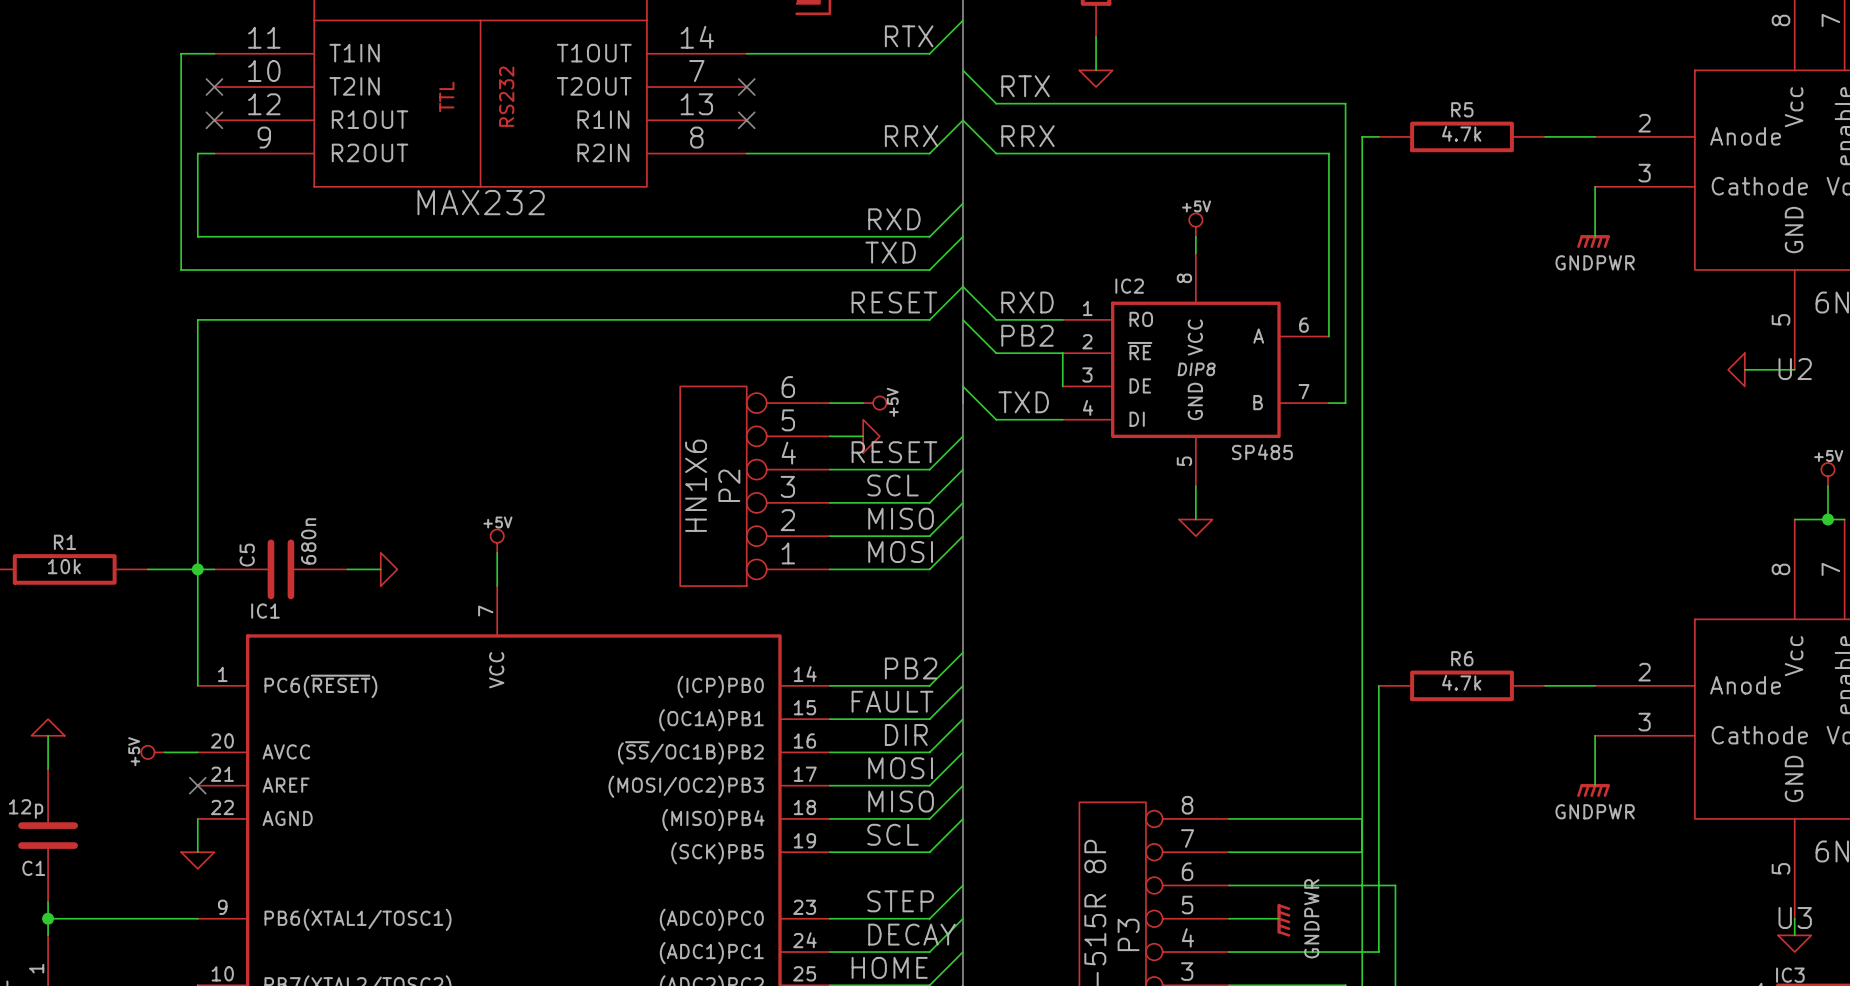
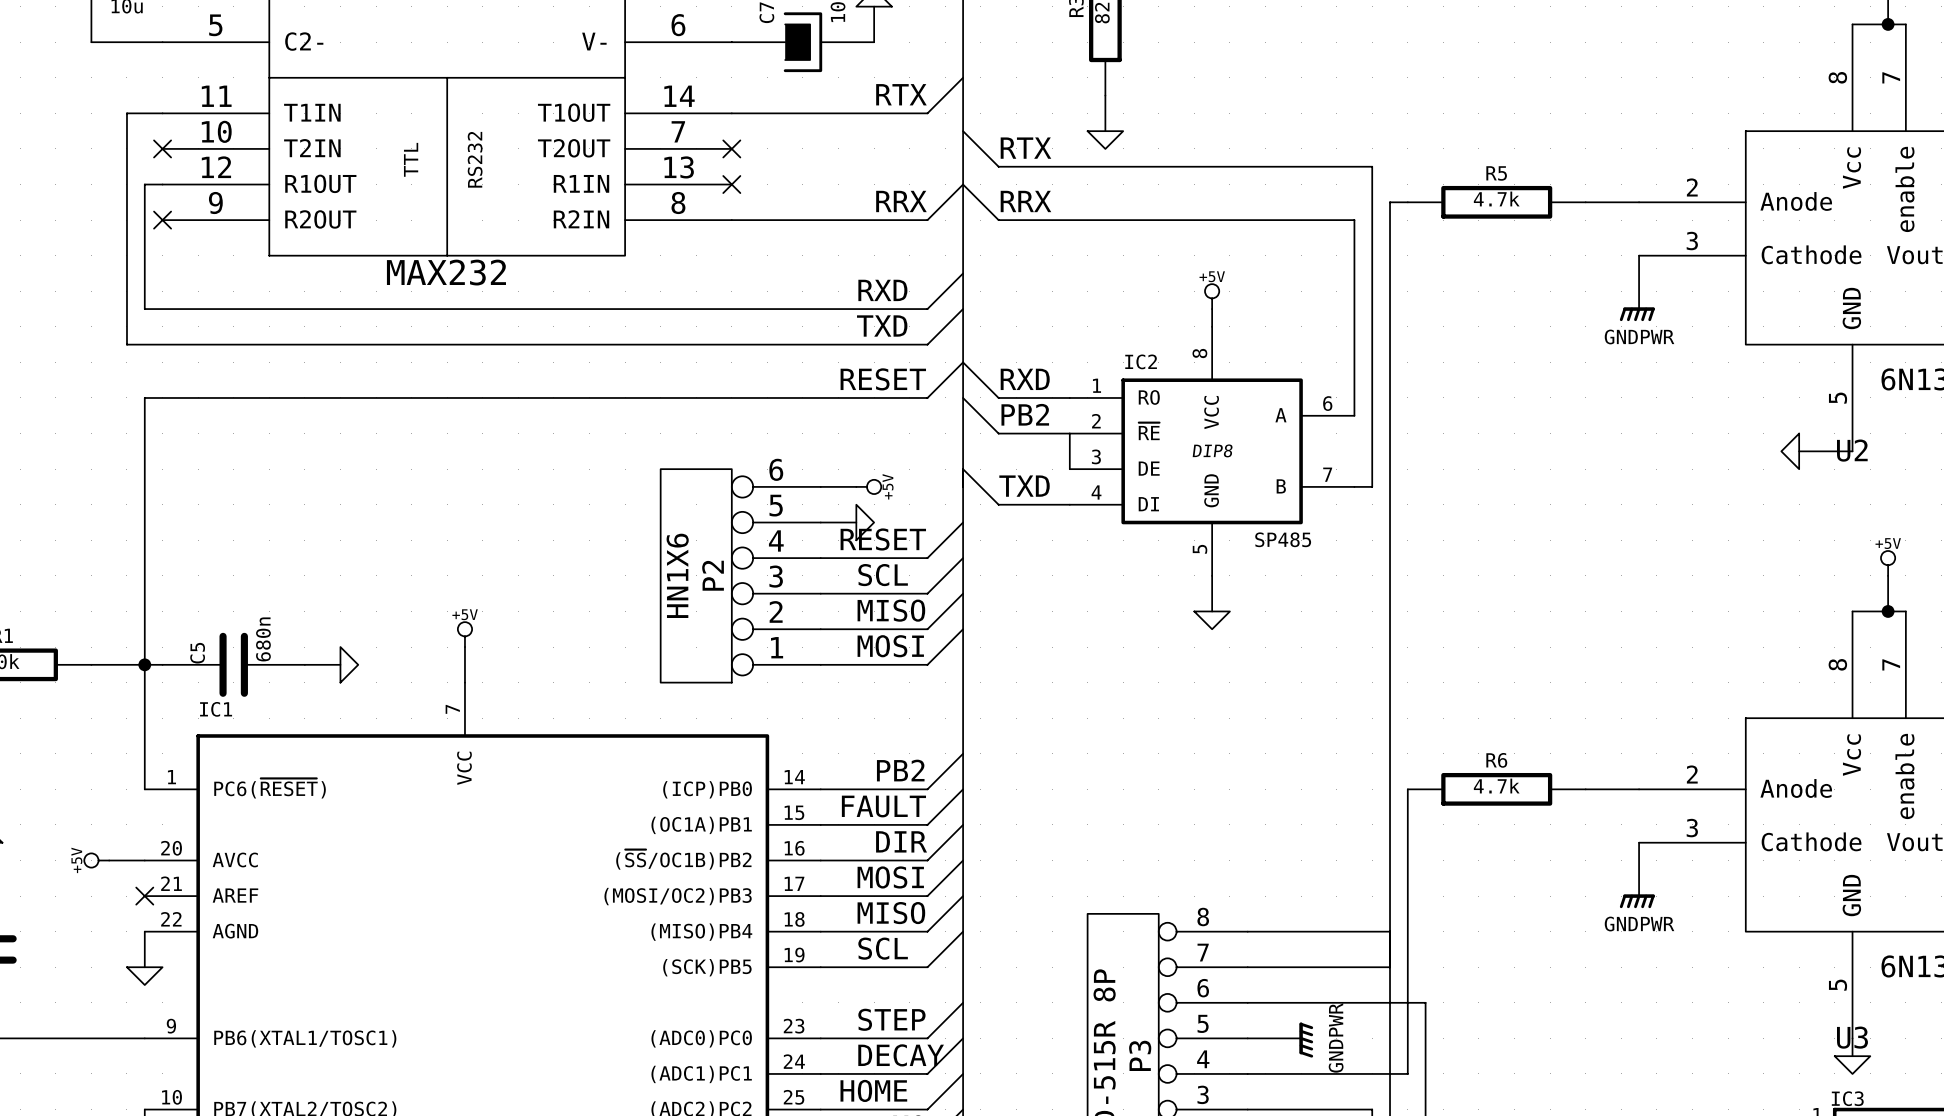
no-connect mark position: (214, 120) -> (162, 220)
wire: (197, 153) (214, 153) -> (144, 220) (144, 184) (162, 184)

